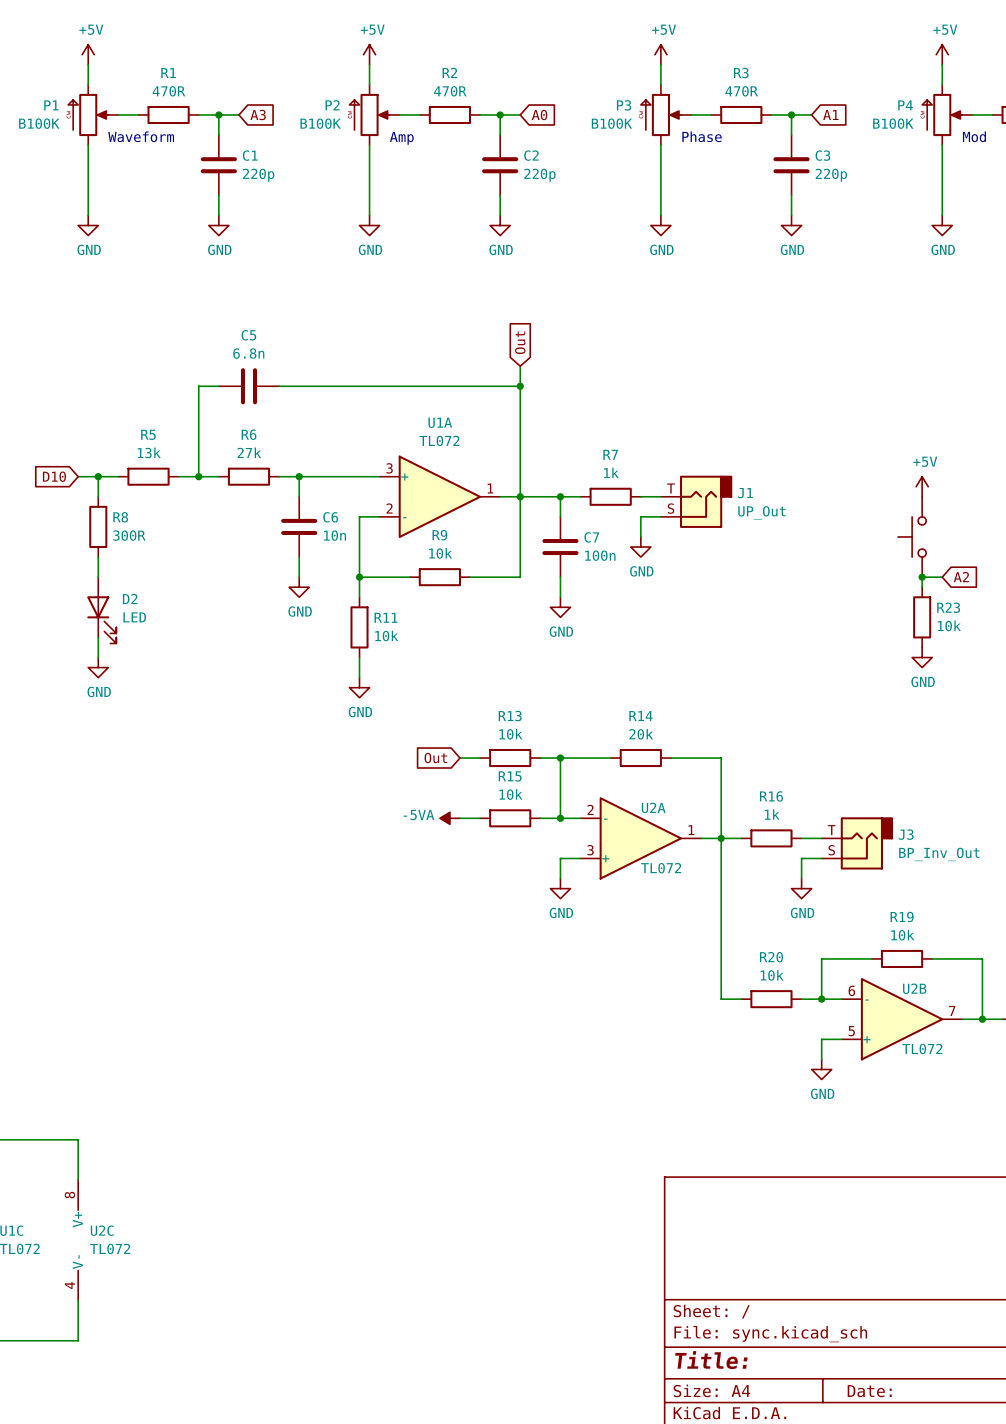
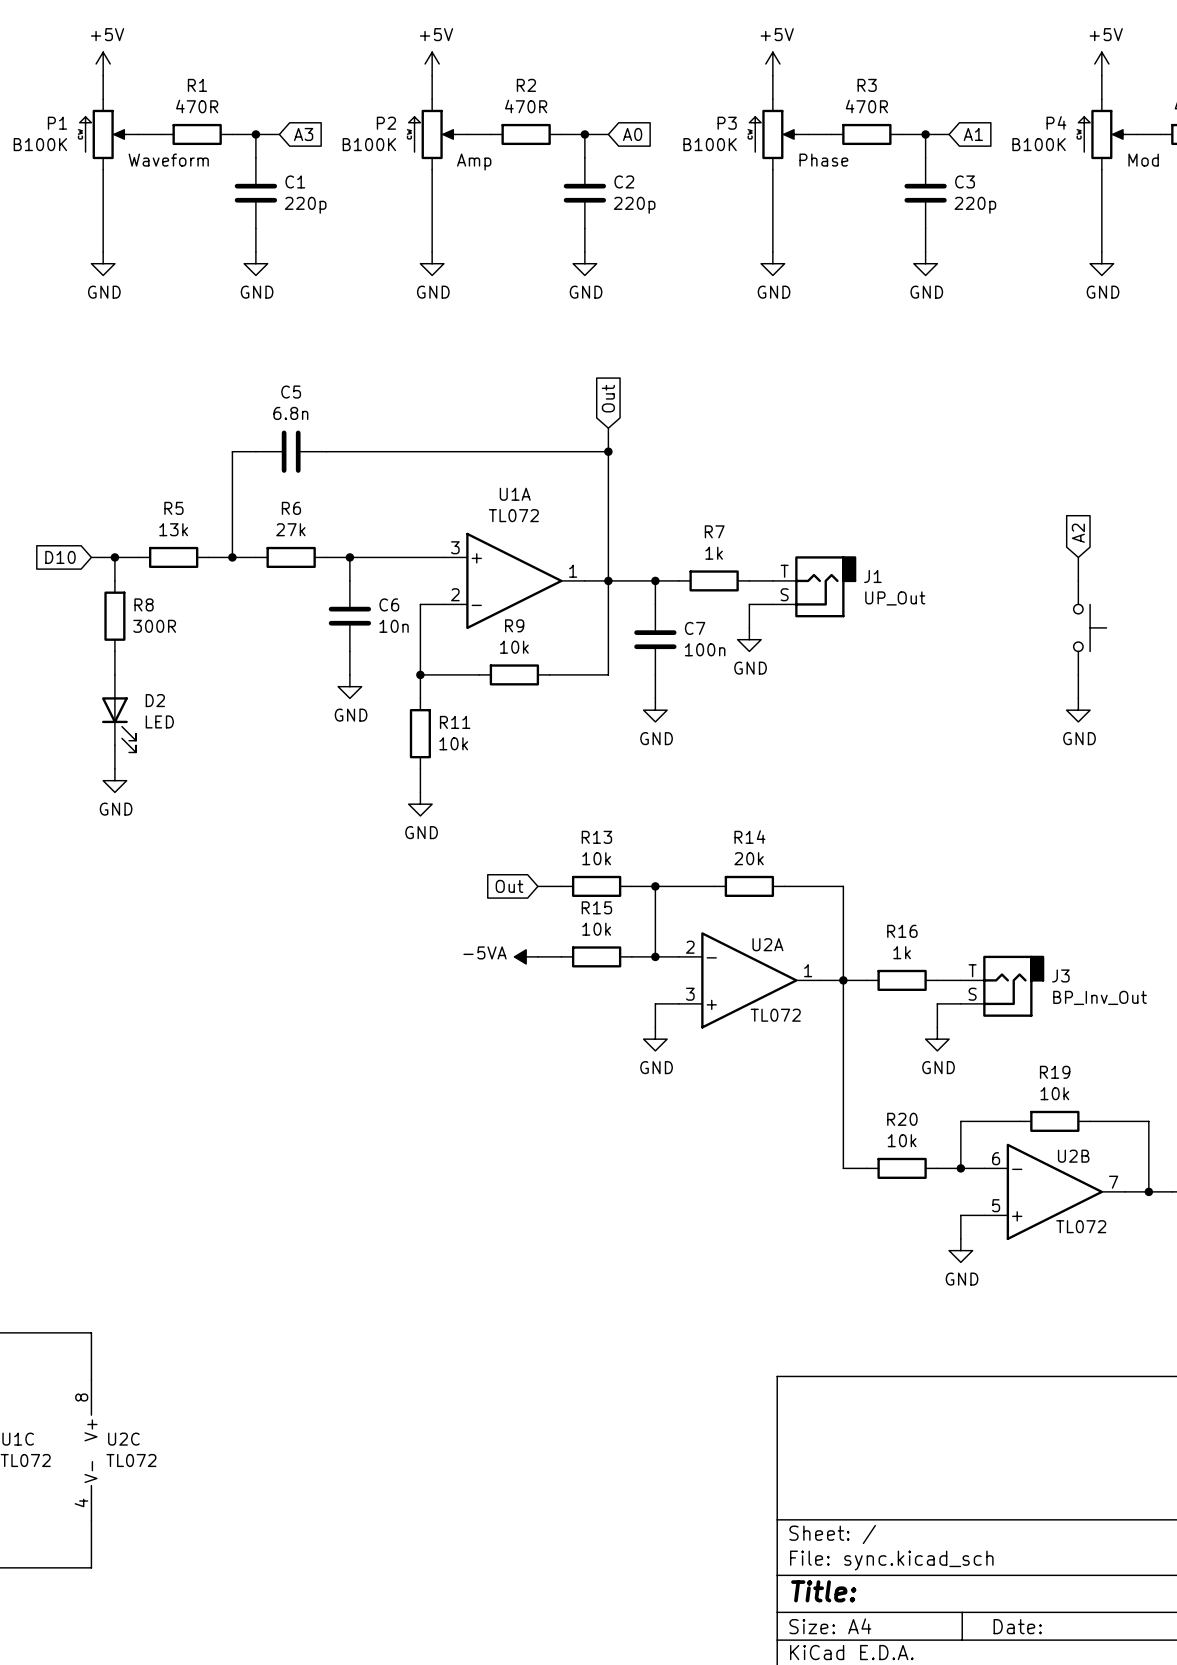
power symbol: +5V (922, 486) -> none
part rotation: 0° (912, 536) -> 180° (1090, 627)
wire: (922, 577) (942, 577) -> none
junction: (922, 577) -> none
global label rotation: 0° (961, 577) -> 90° counterclockwise (1078, 533)
global label position: A2 (961, 577) -> A2 (1078, 533)
R23: 10k (922, 617) -> none
power symbol position: GND (922, 657) -> GND (1078, 710)

